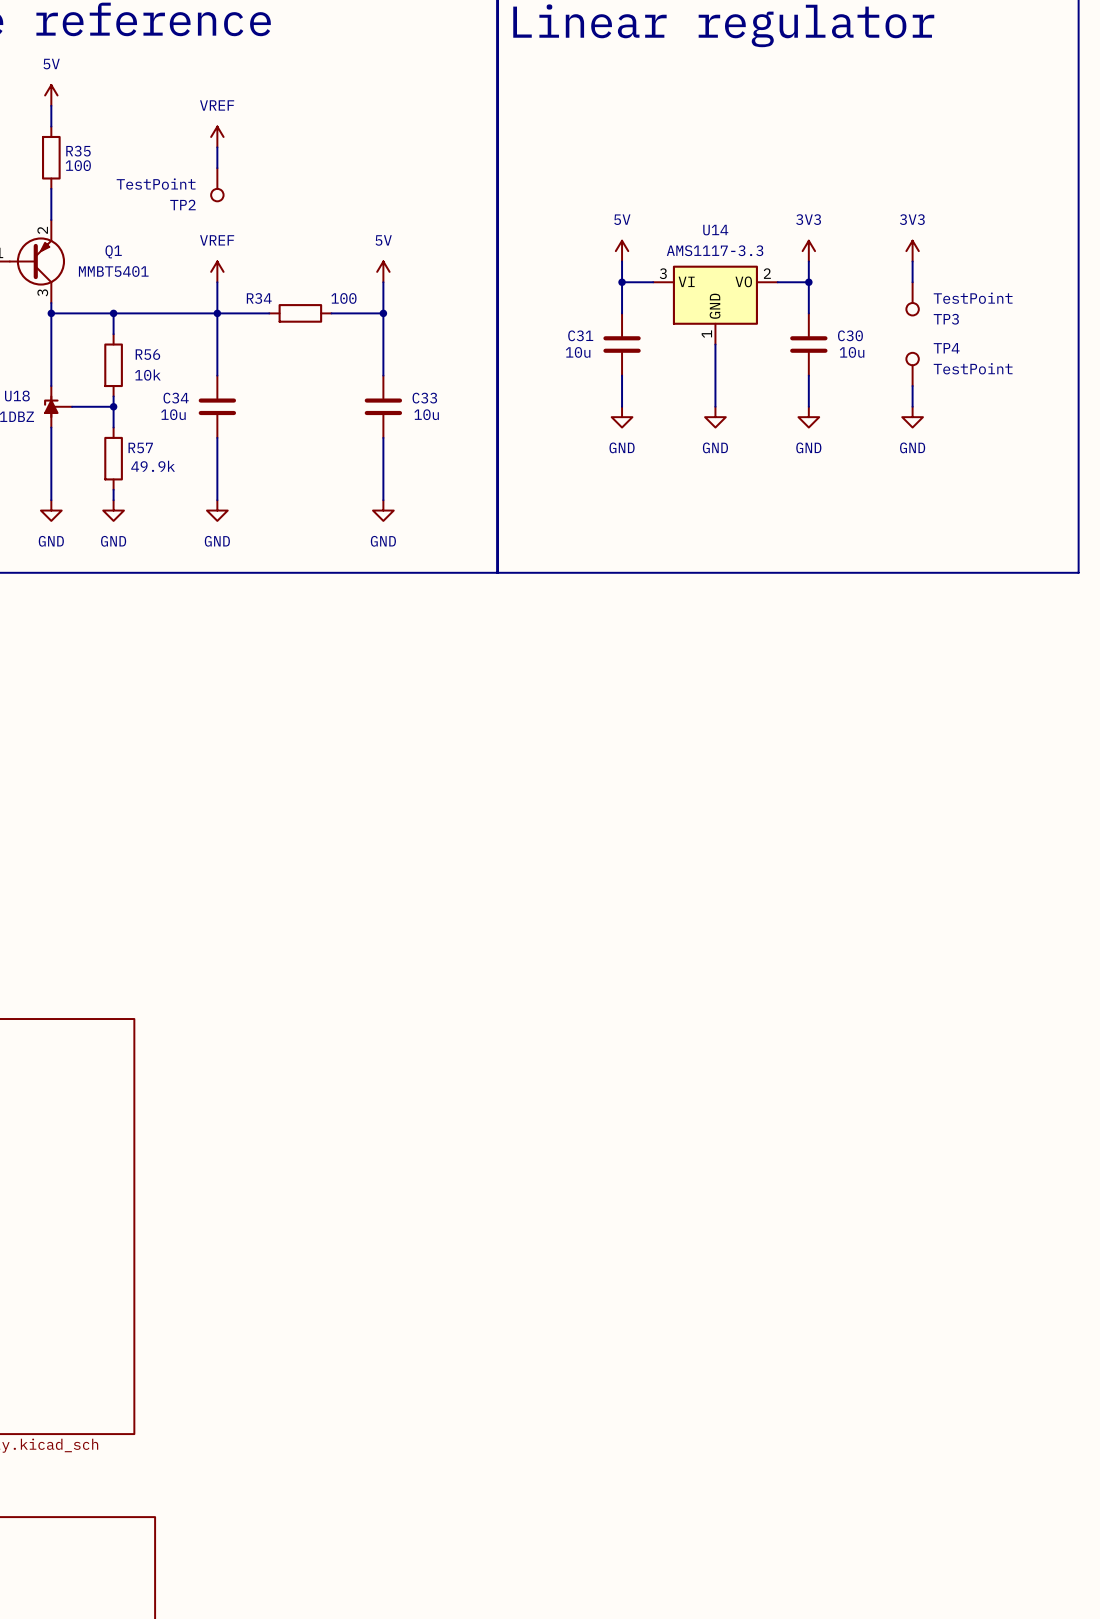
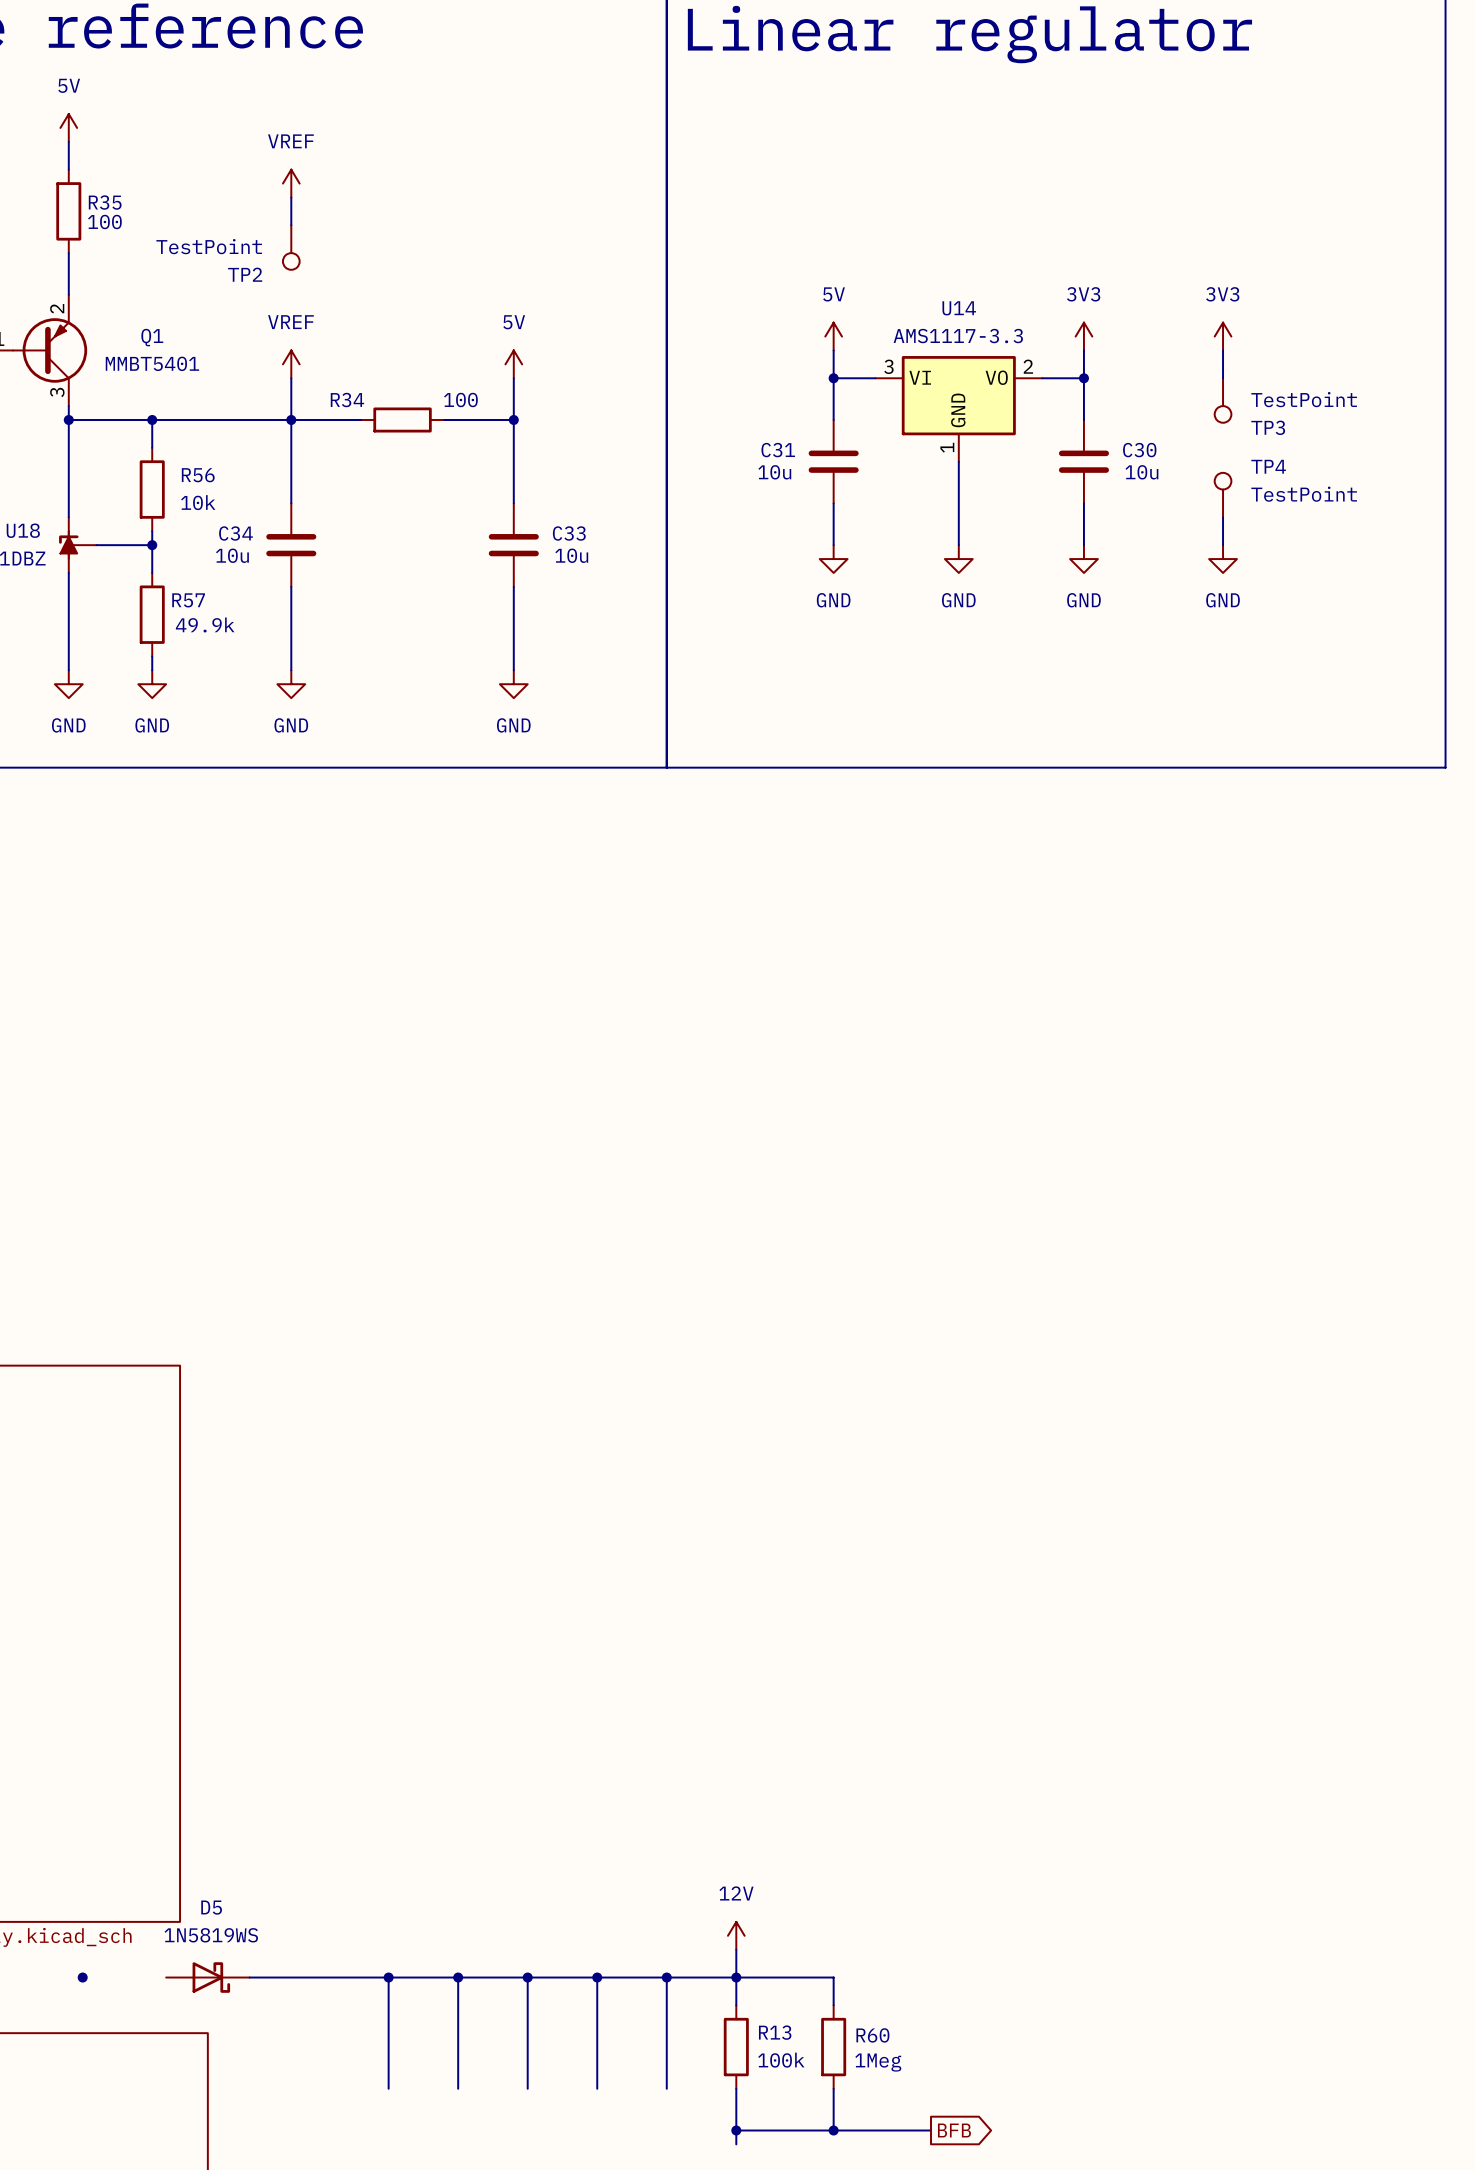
power symbol: none -> 12V (736, 1935)
wire: none -> (736, 1949) (736, 2005)
junction: none -> (82, 1977)
D5: none -> 1N5819WS (207, 1977)
wire: none -> (249, 1977) (833, 1977) (833, 2005)
wire: none -> (388, 1977) (388, 2088)
junction: none -> (388, 1977)
wire: none -> (458, 1977) (458, 2088)
junction: none -> (458, 1977)
wire: none -> (527, 1977) (527, 2088)
junction: none -> (527, 1977)
wire: none -> (597, 1977) (597, 2088)
junction: none -> (597, 1977)
wire: none -> (666, 1977) (666, 2088)
junction: none -> (666, 1977)
junction: none -> (736, 1977)
R13: none -> 100k (736, 2047)
R60: none -> 1Meg (833, 2047)
wire: none -> (736, 2088) (736, 2144)
wire: none -> (833, 2088) (833, 2130)
wire: none -> (736, 2130) (931, 2130)
junction: none -> (736, 2130)
junction: none -> (833, 2130)
global label: none -> BFB (954, 2130)

